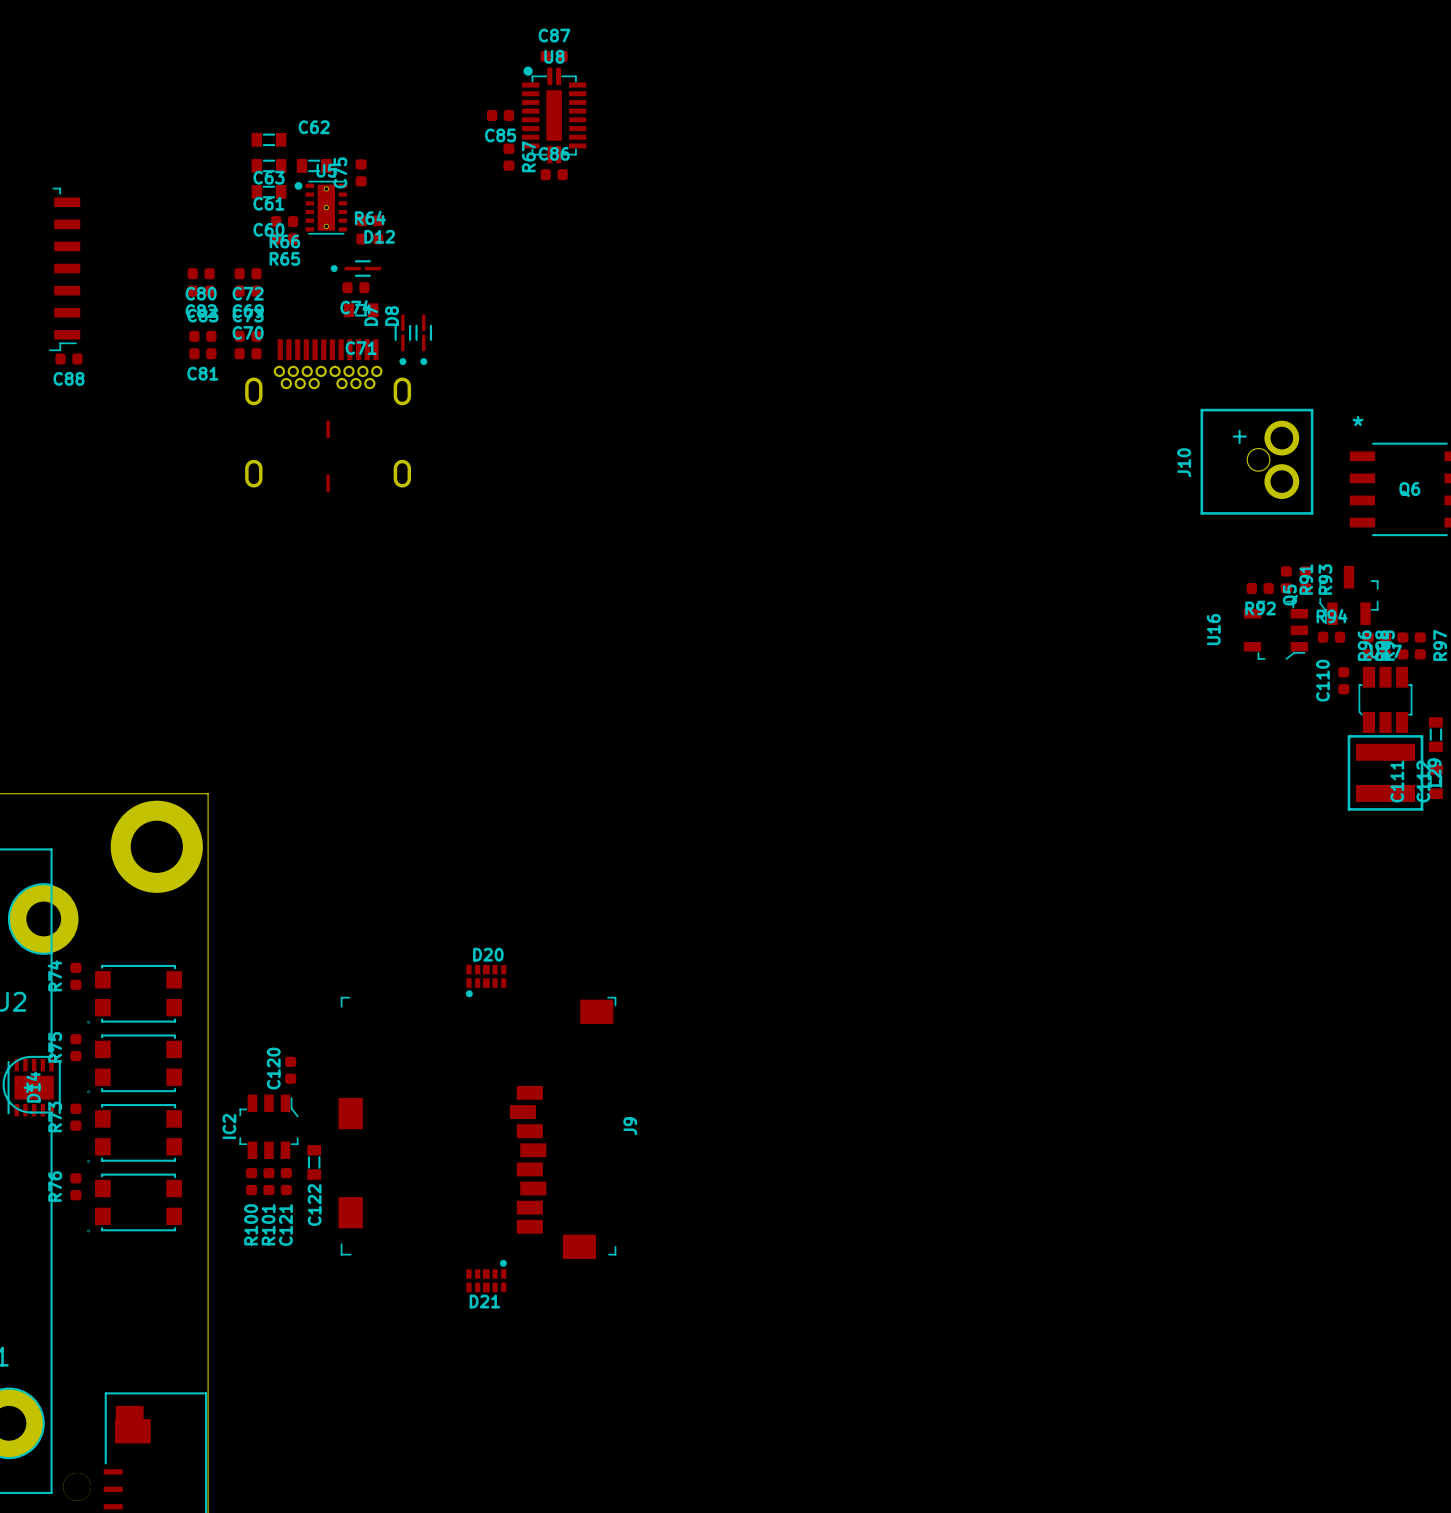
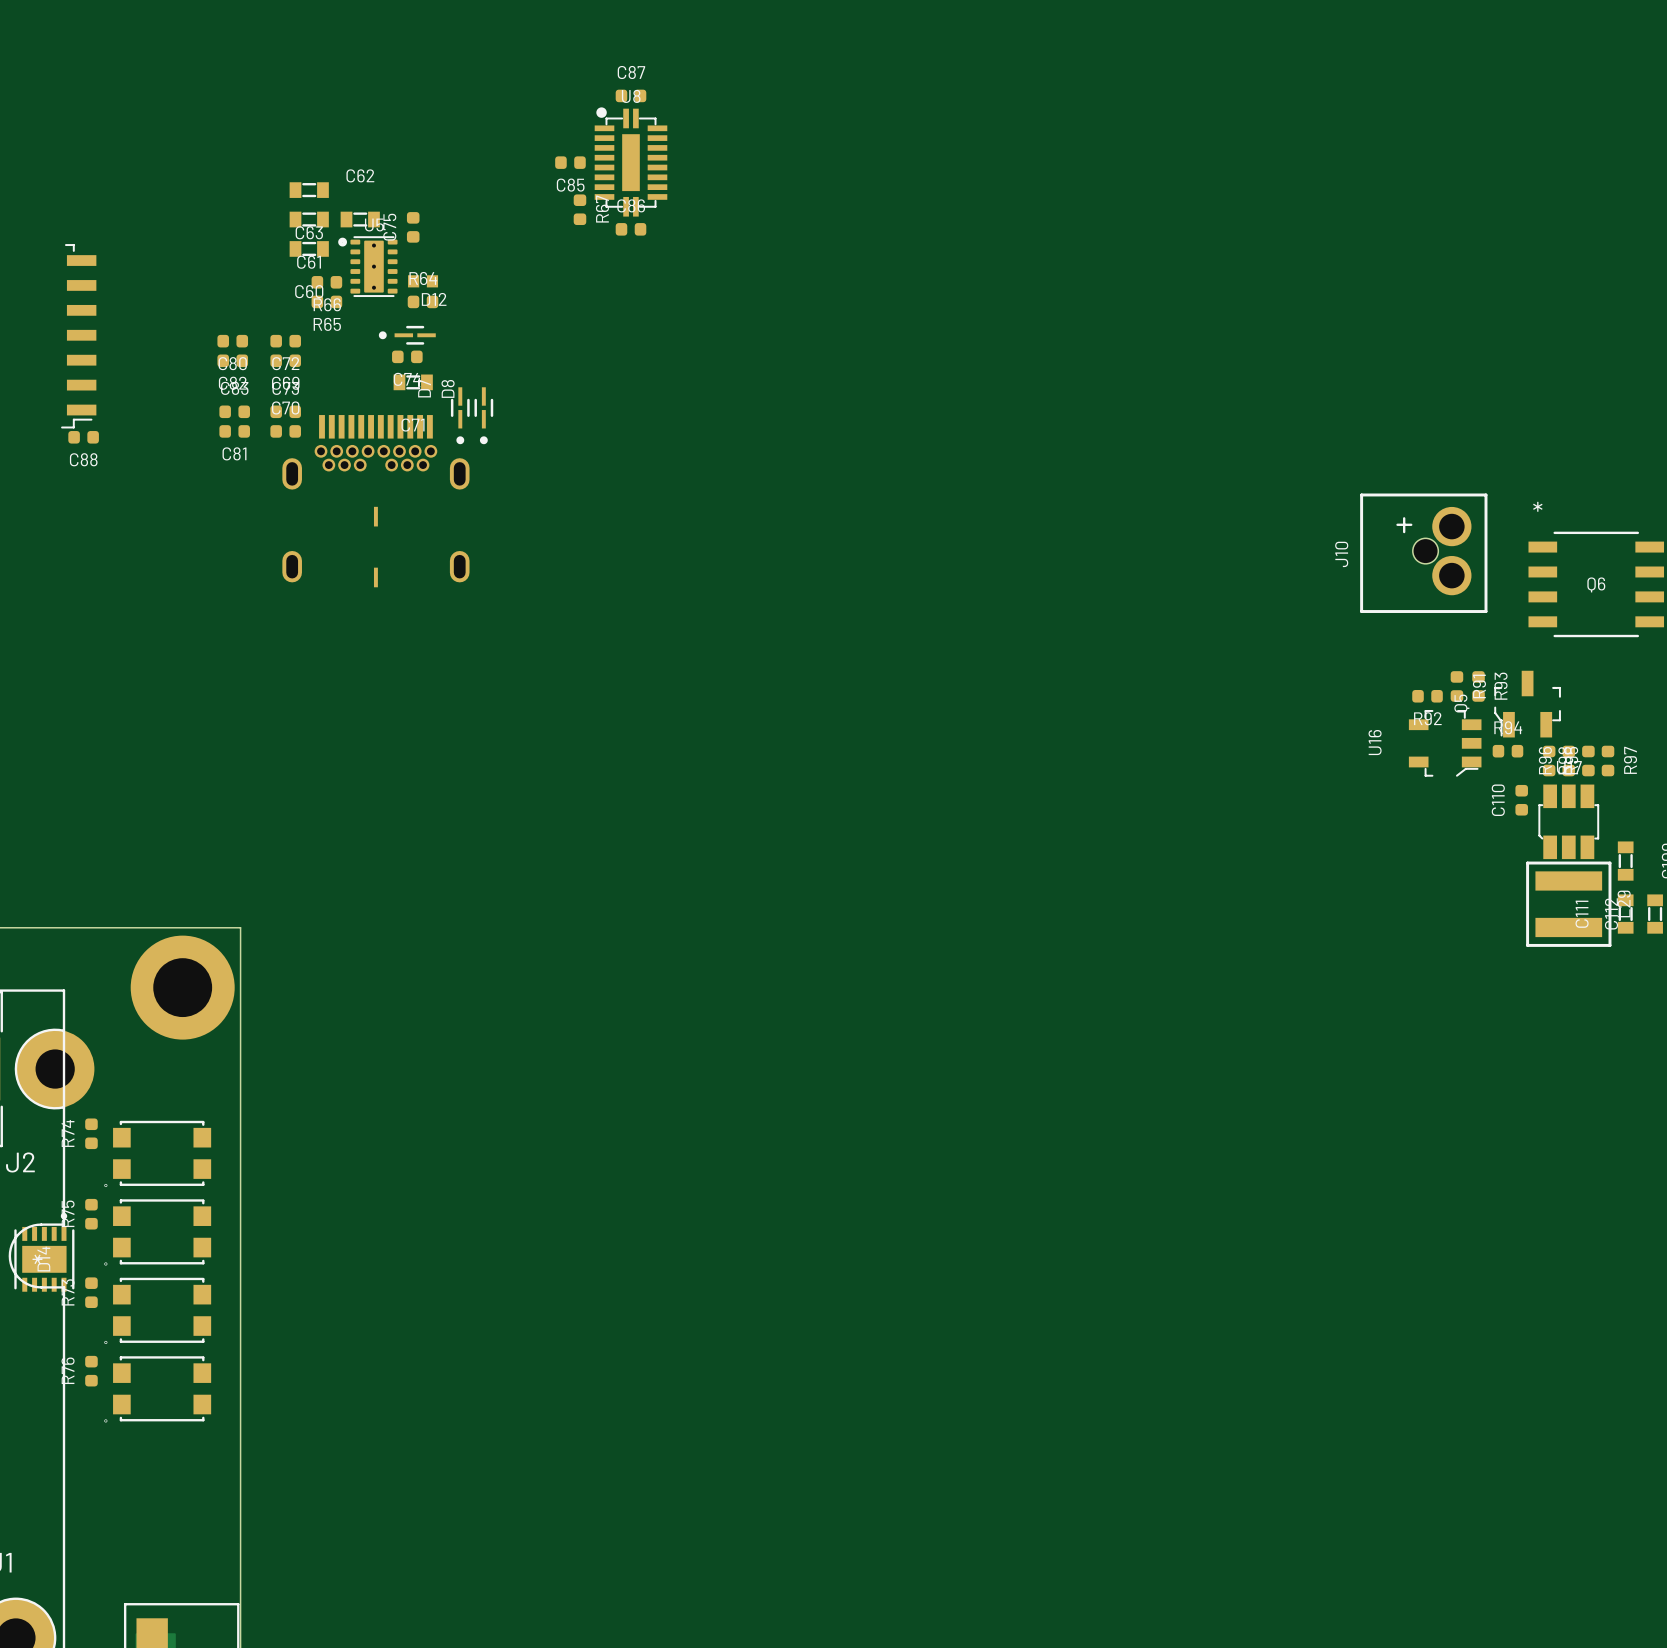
D20: (486, 981) -> none
C120: (290, 1070) -> none
IC2: (268, 1126) -> none
J9: (477, 1127) -> none
C122: (314, 1162) -> none
R100: (251, 1181) -> none
R101: (268, 1181) -> none
C121: (286, 1181) -> none
D21: (486, 1276) -> none

